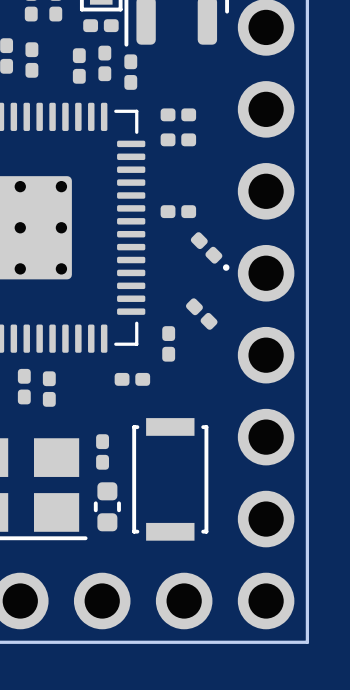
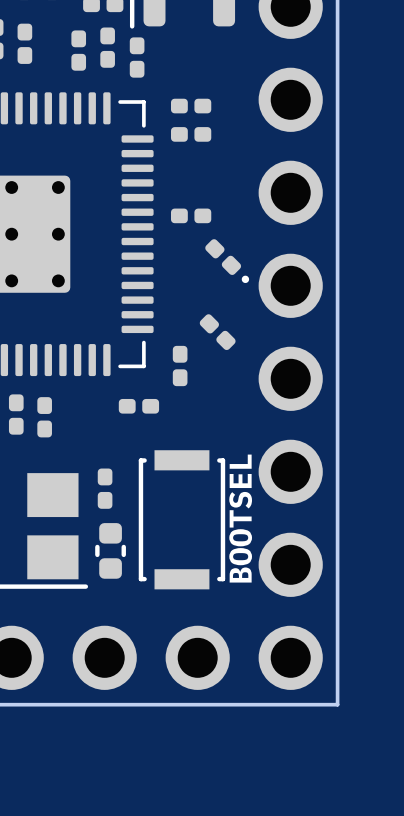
text: none -> BOOTSEL (240, 518)

